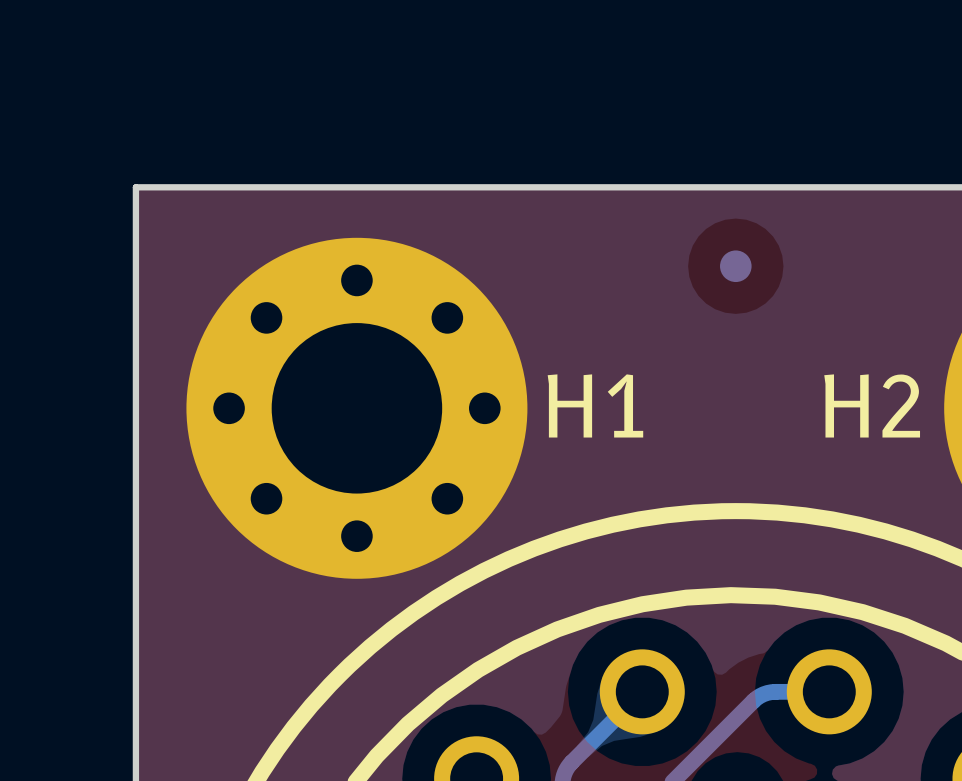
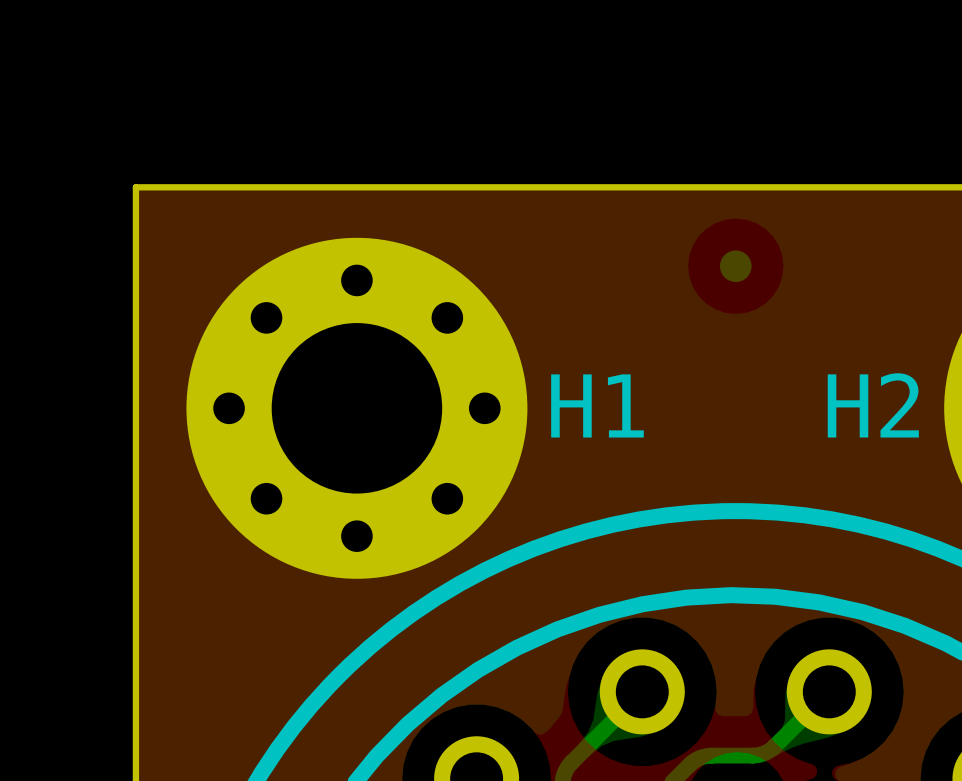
bottom track: (829, 691) (775, 691) (759, 696) (689, 764) -> (829, 691) (767, 751) (755, 755) (707, 755) (699, 758) (689, 764)

